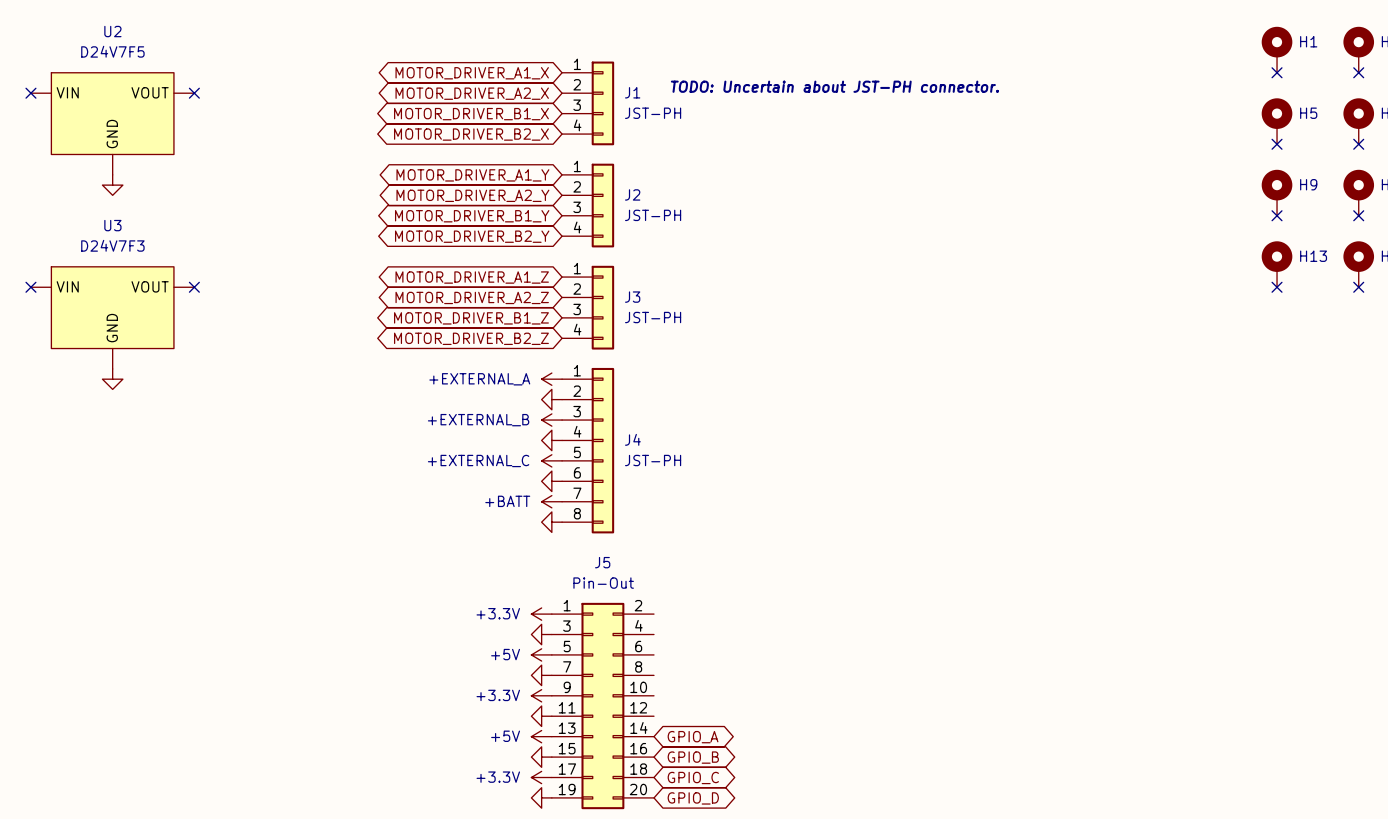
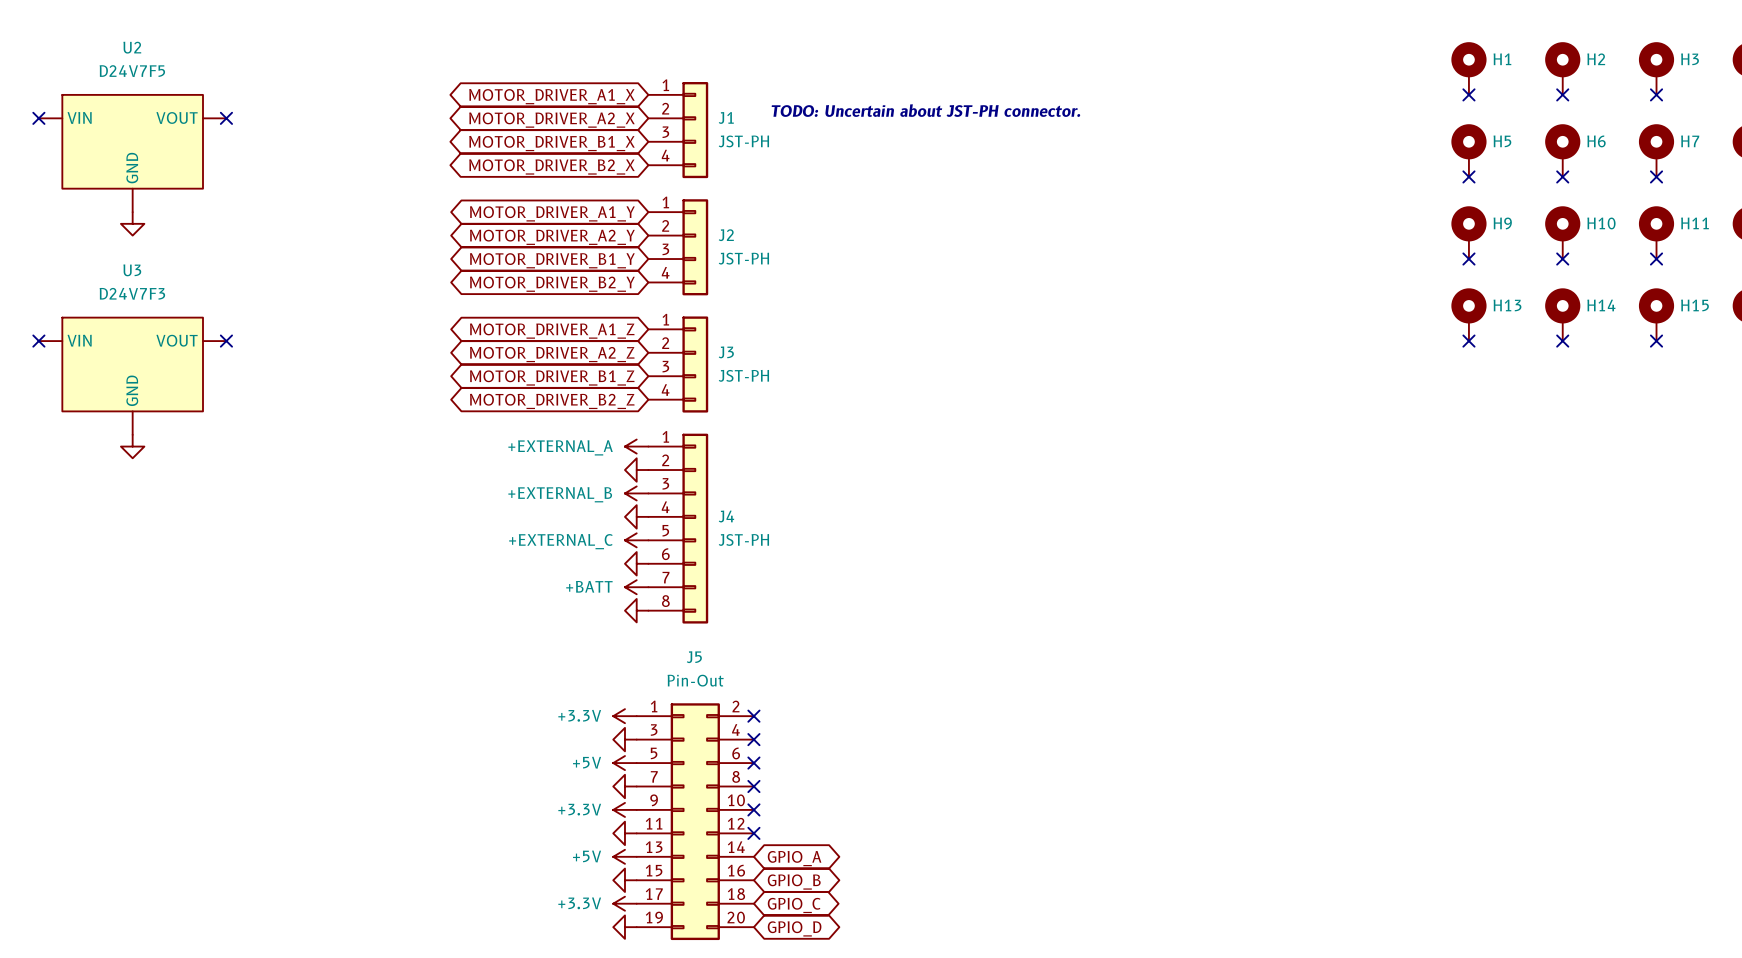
no-connect mark: none -> (753, 716)
no-connect mark: none -> (753, 739)
no-connect mark: none -> (753, 763)
no-connect mark: none -> (753, 786)
no-connect mark: none -> (753, 809)
no-connect mark: none -> (753, 833)

